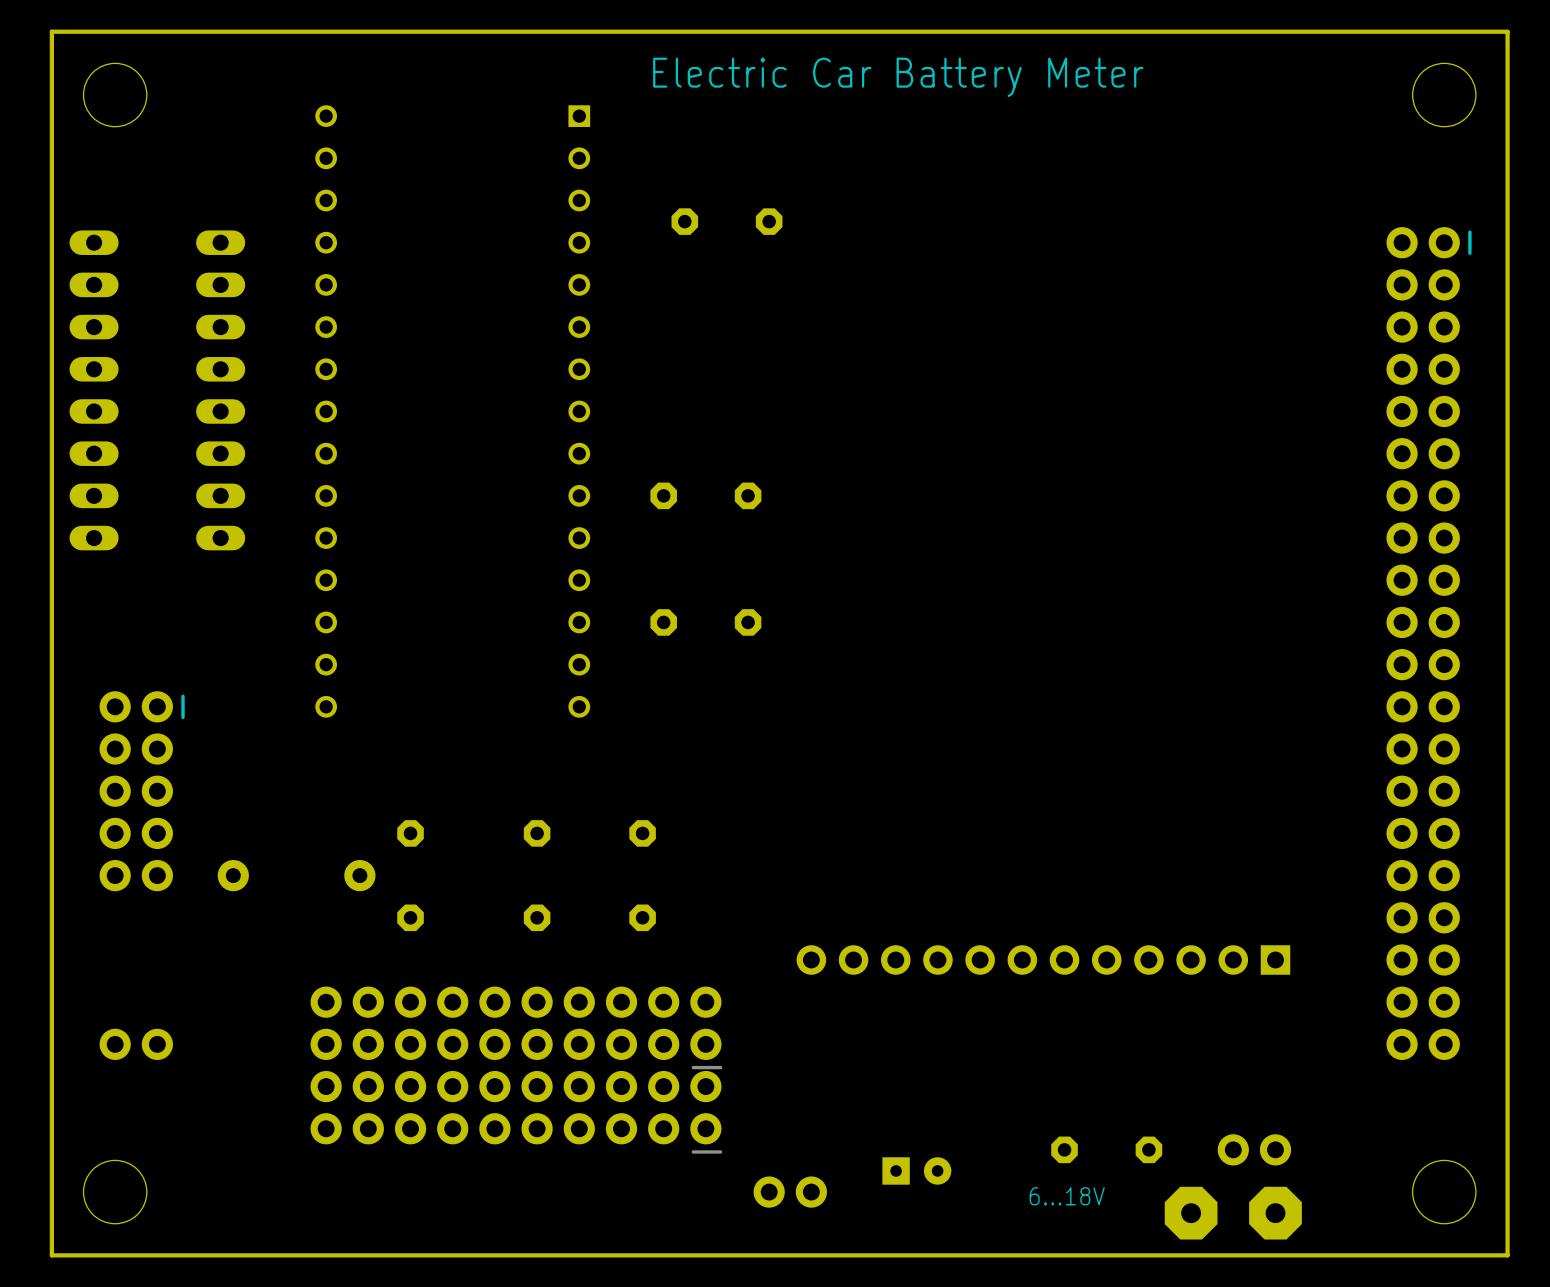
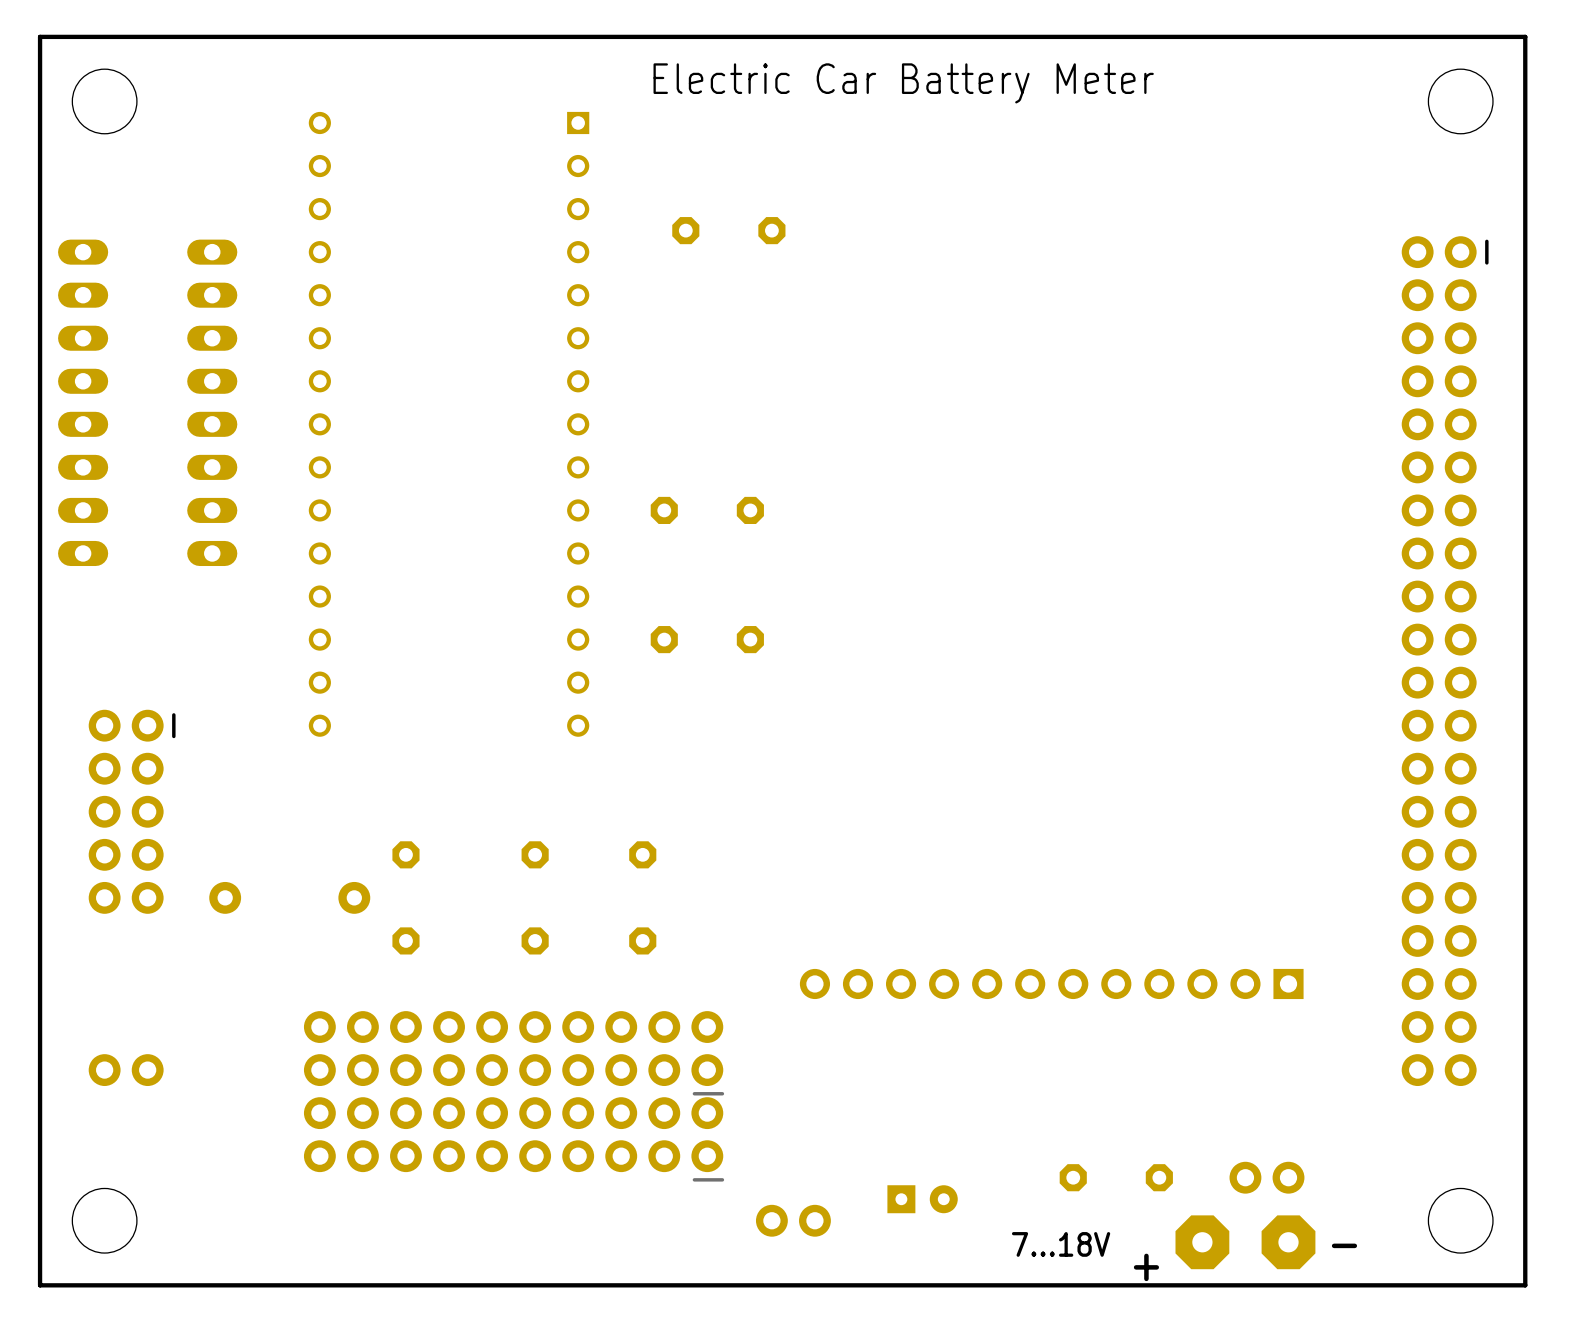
text: 6...18V (1067, 1196) -> 7...18V (1061, 1244)
text: none -> - (1344, 1245)
text: none -> + (1146, 1267)

